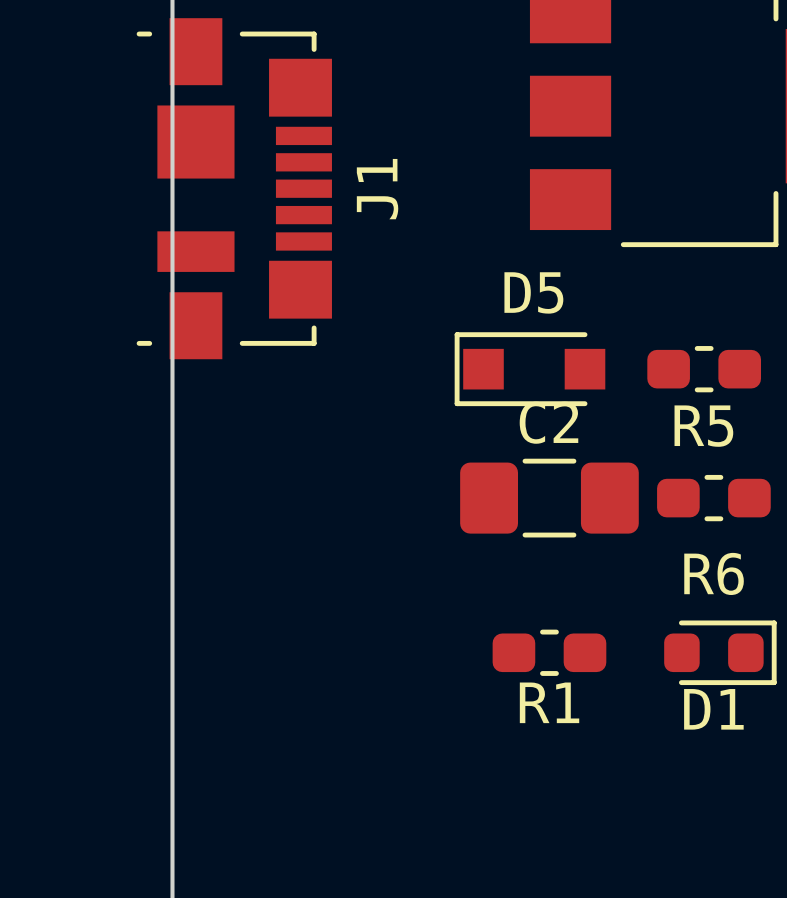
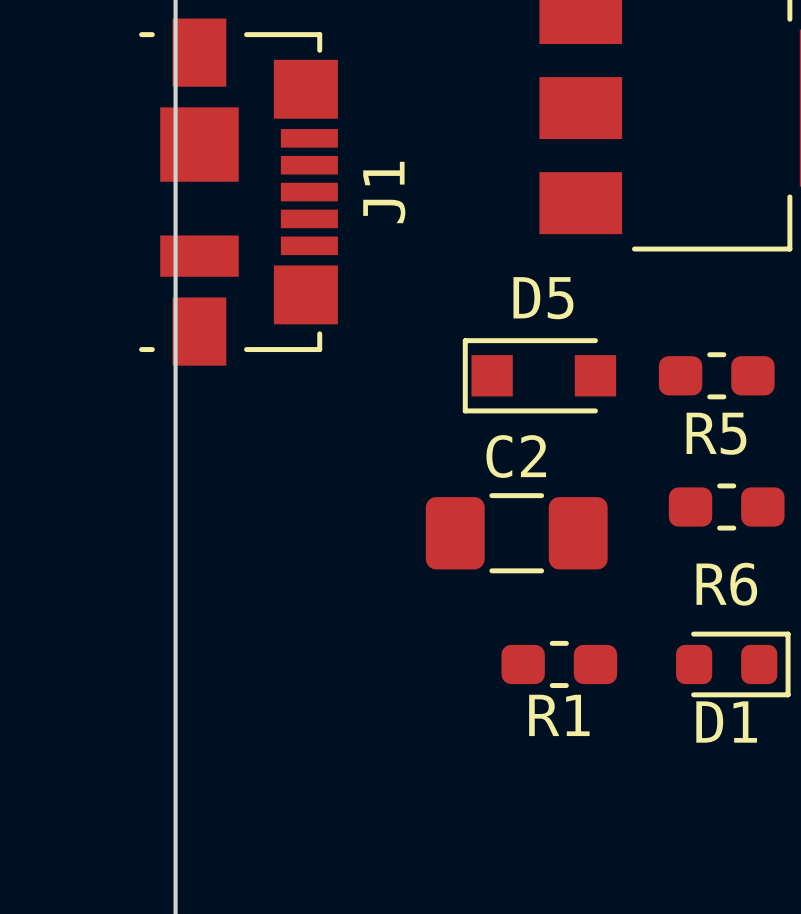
C2 position: (549, 498) -> (516, 533)

